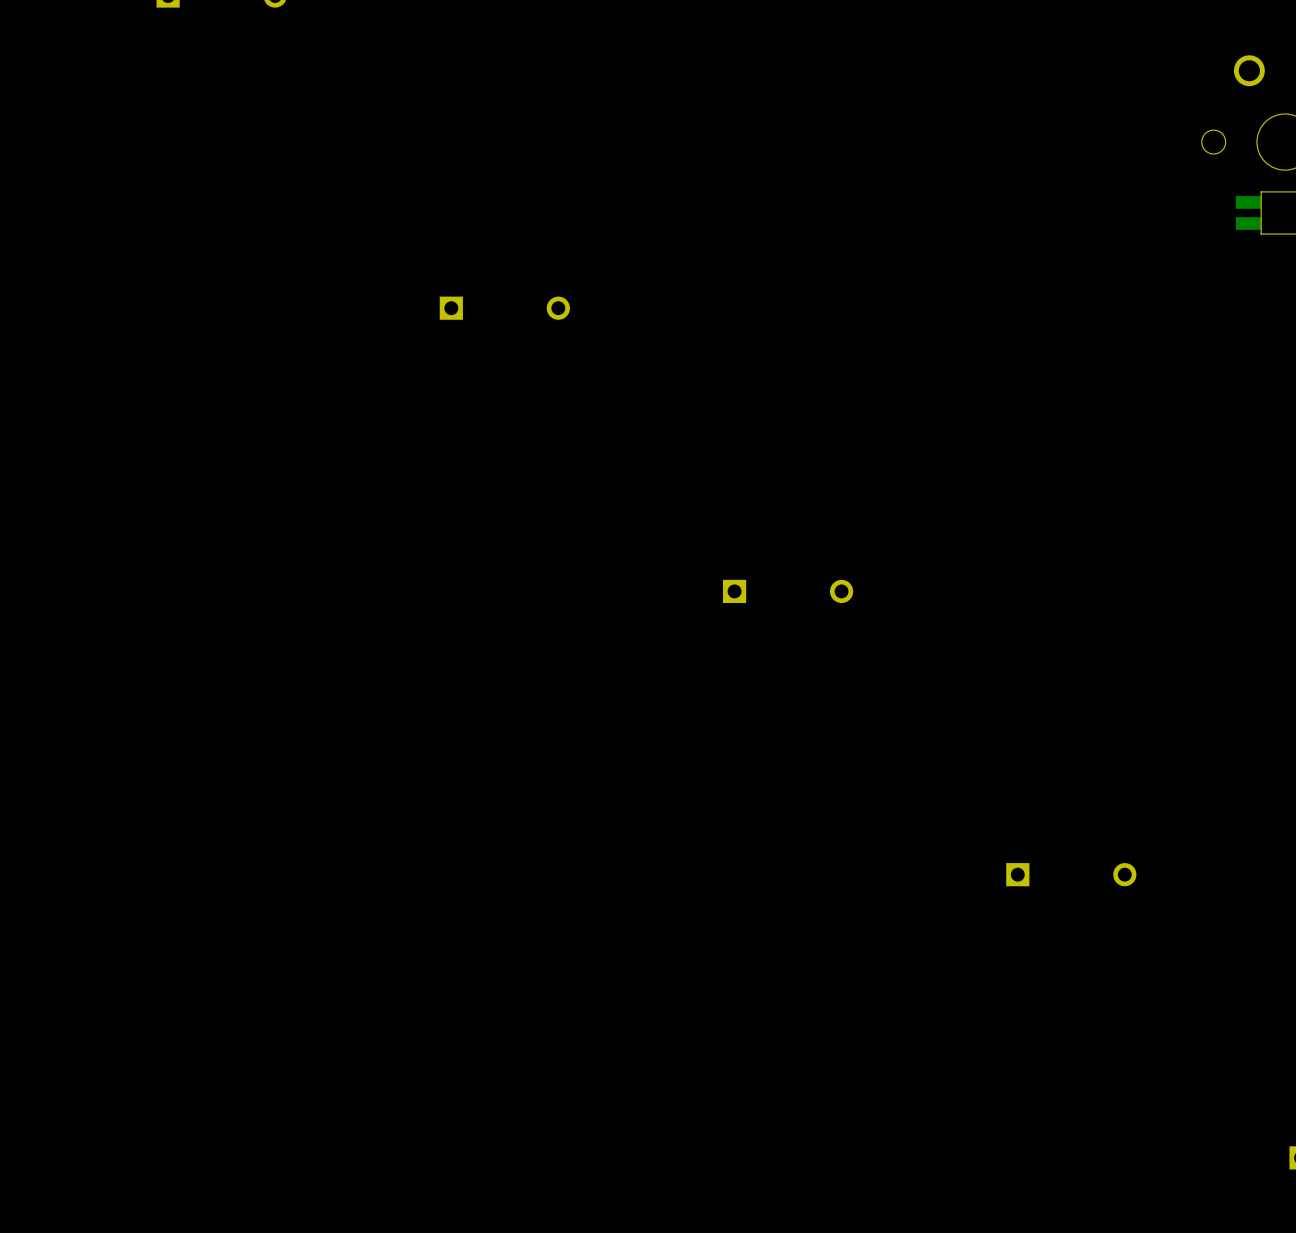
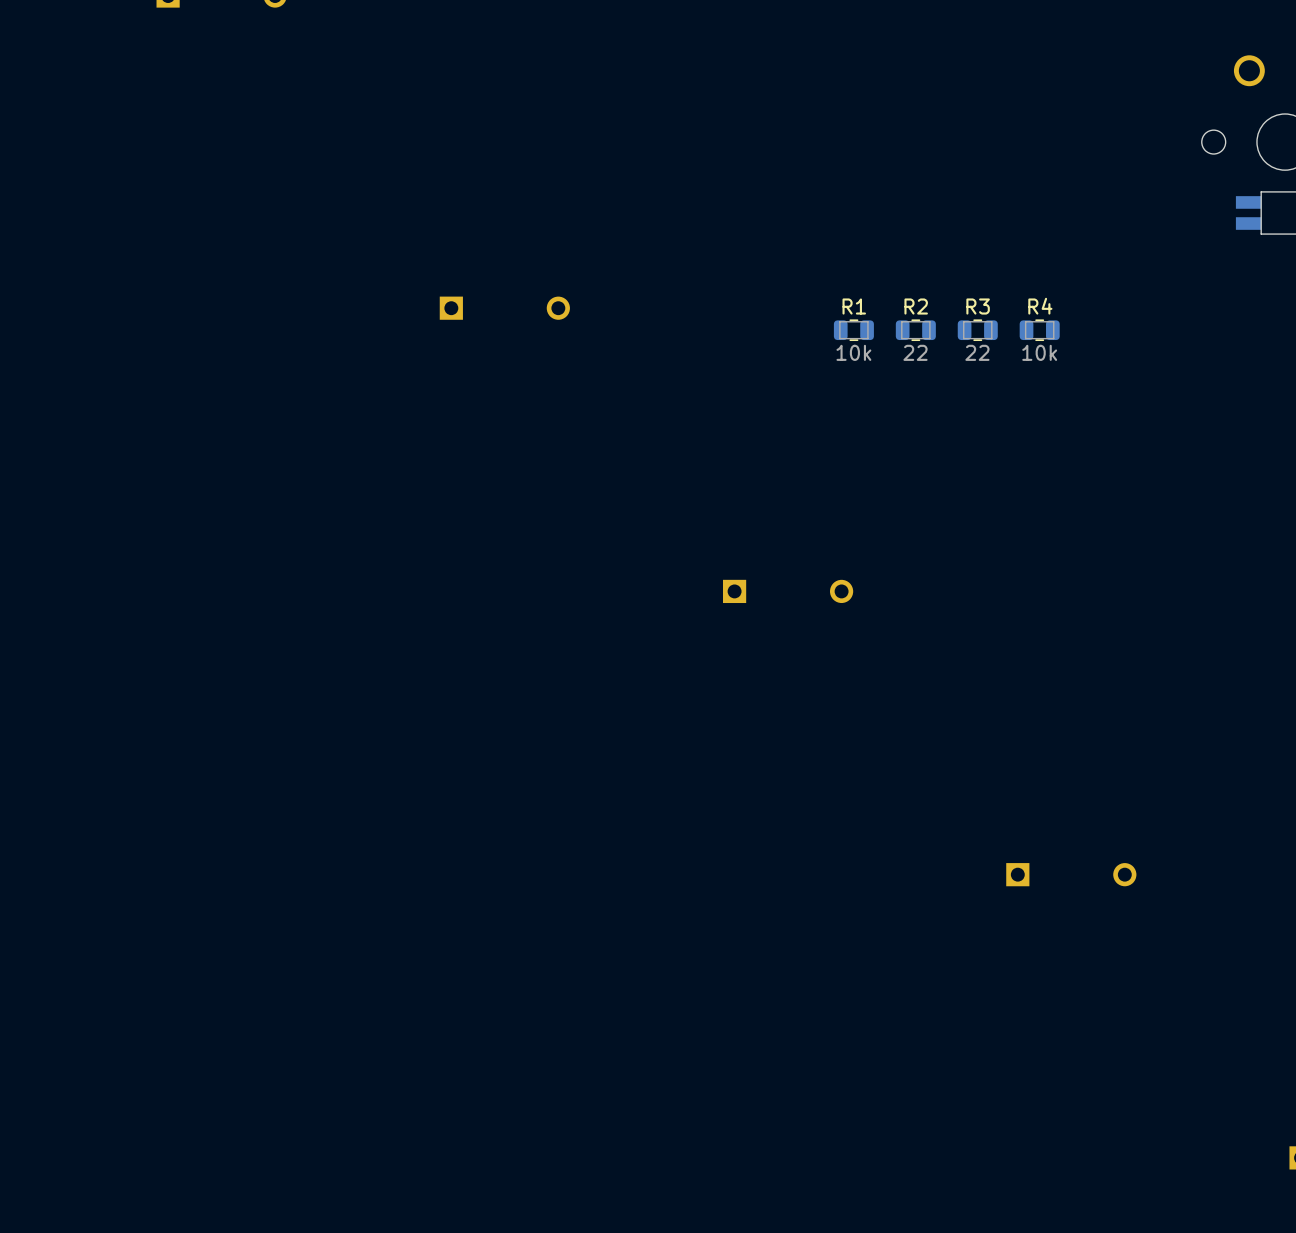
R1: none -> 10k (853, 330)
R2: none -> 22 (915, 330)
R3: none -> 22 (977, 330)
R4: none -> 10k (1039, 330)

